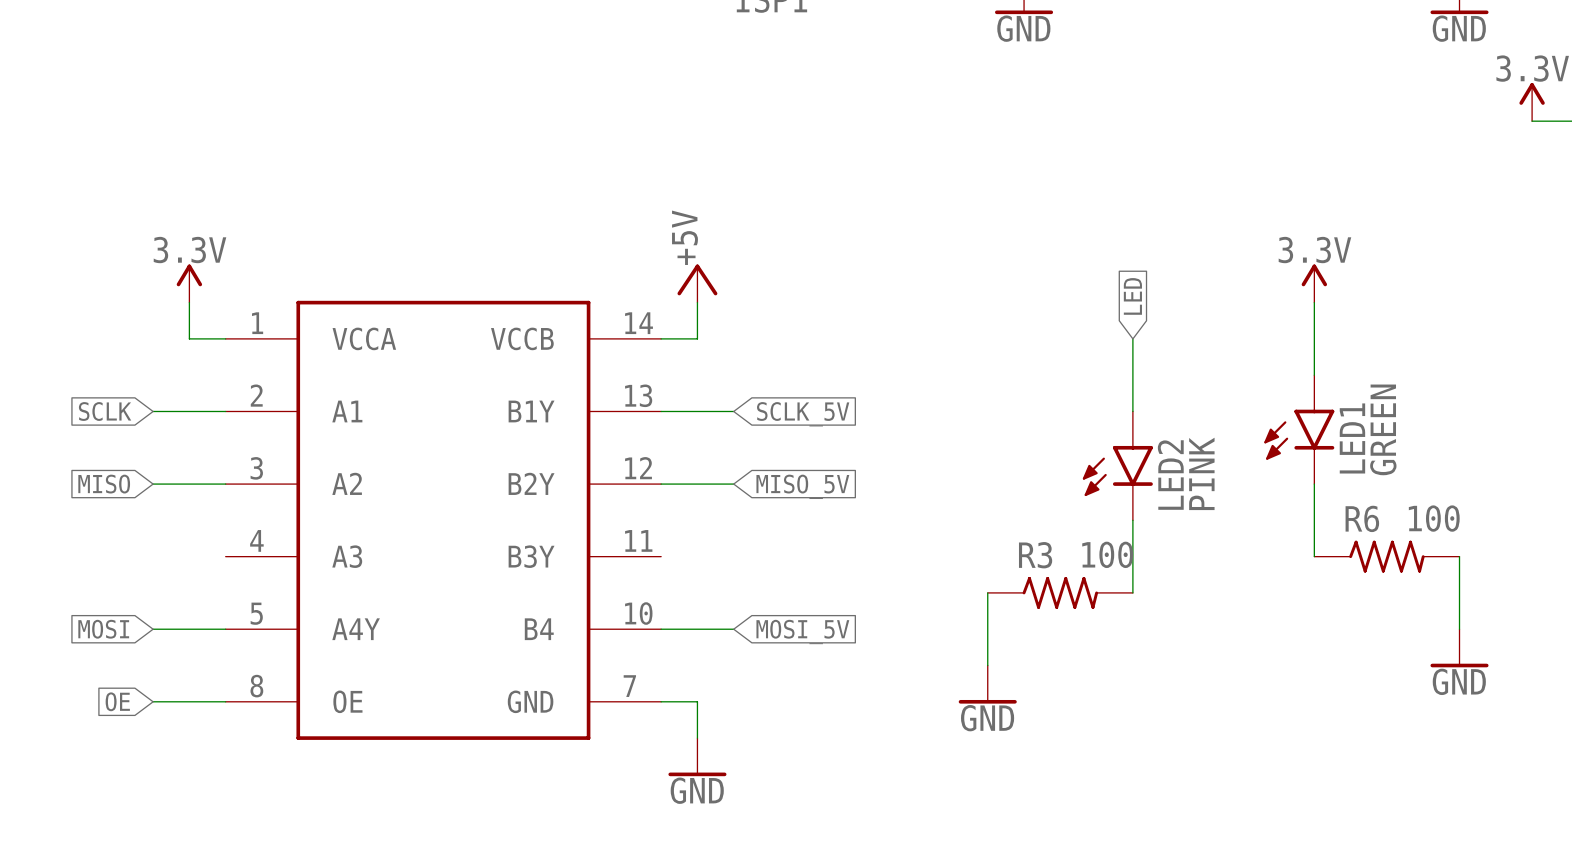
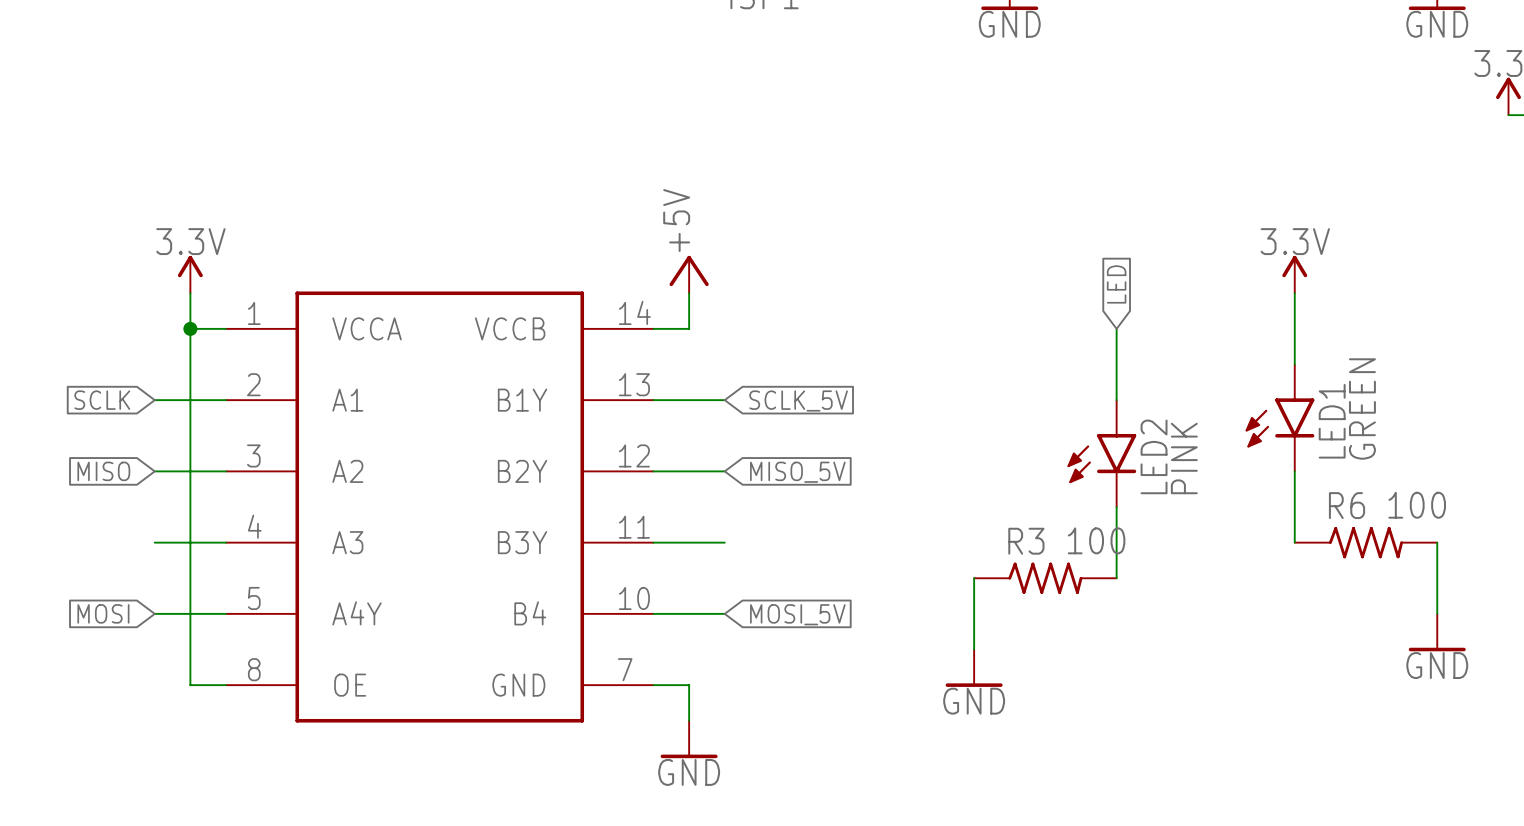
junction: none -> (190, 328)
wire: none -> (154, 542) (226, 542)
wire: none -> (653, 542) (724, 542)
global label: OE (117, 701) -> none
wire: (153, 701) (189, 701) -> (190, 328) (190, 685)

